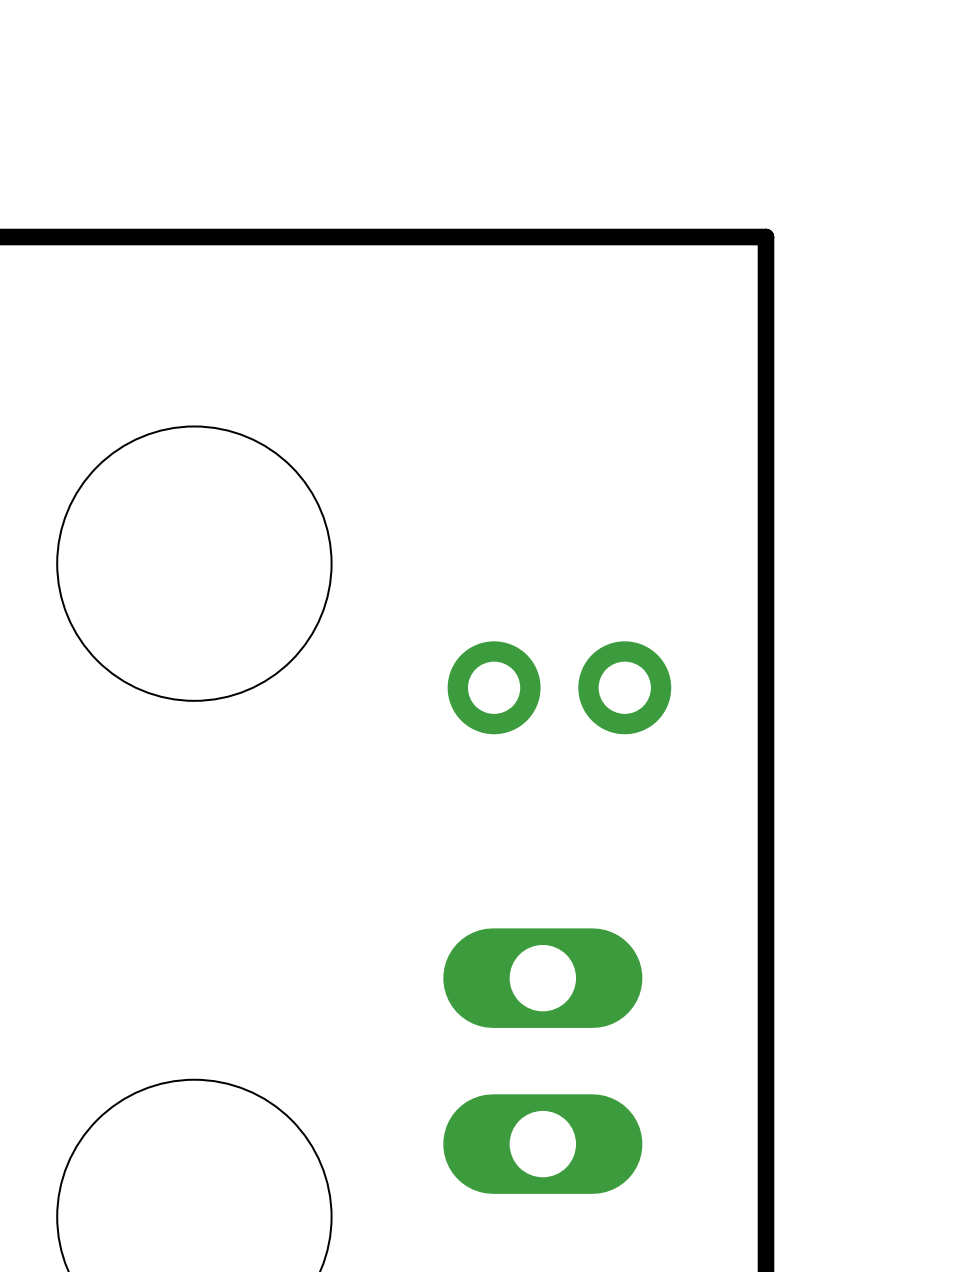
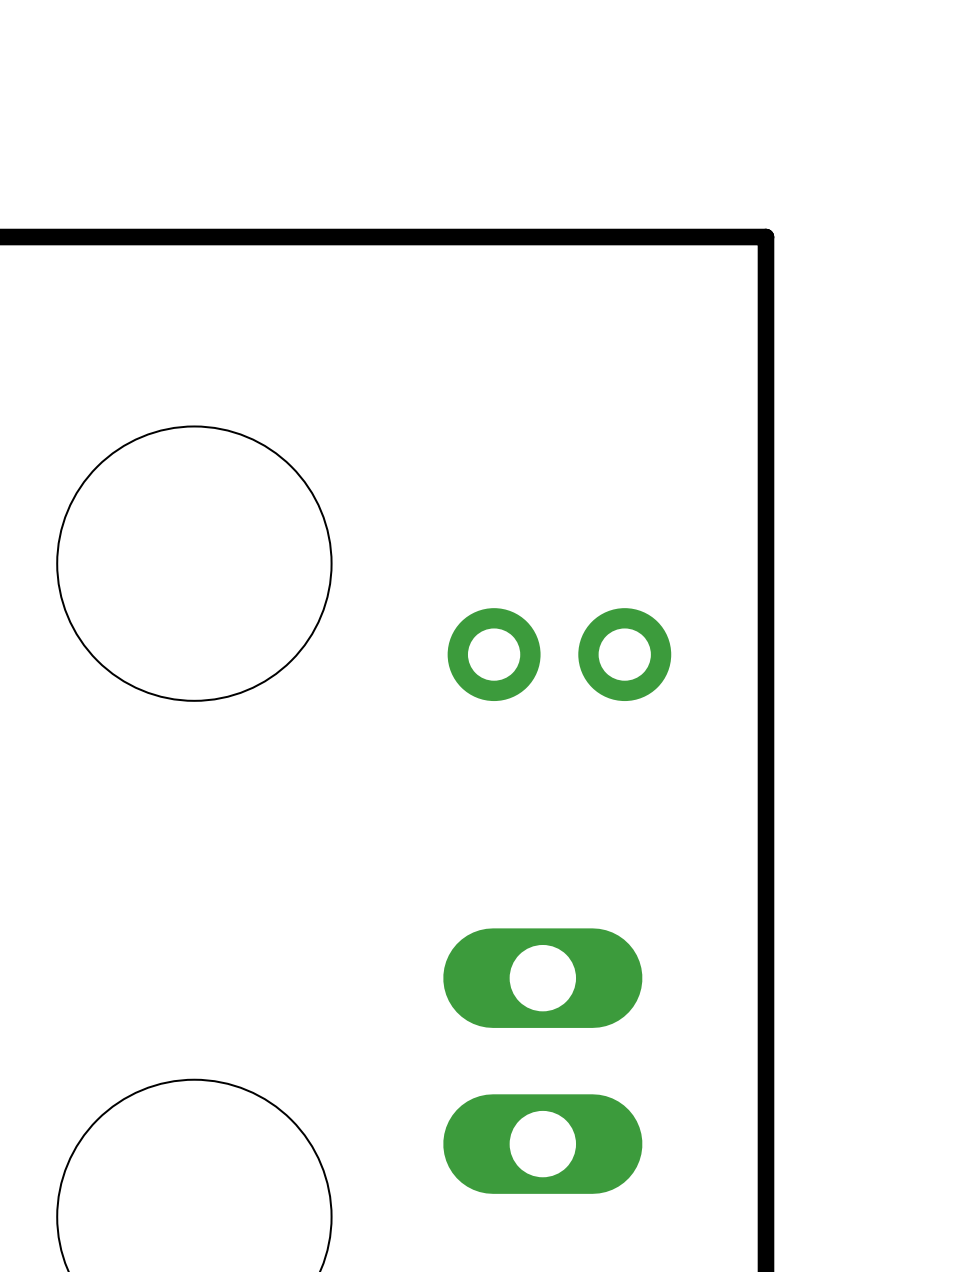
part position: (559, 687) -> (559, 654)

